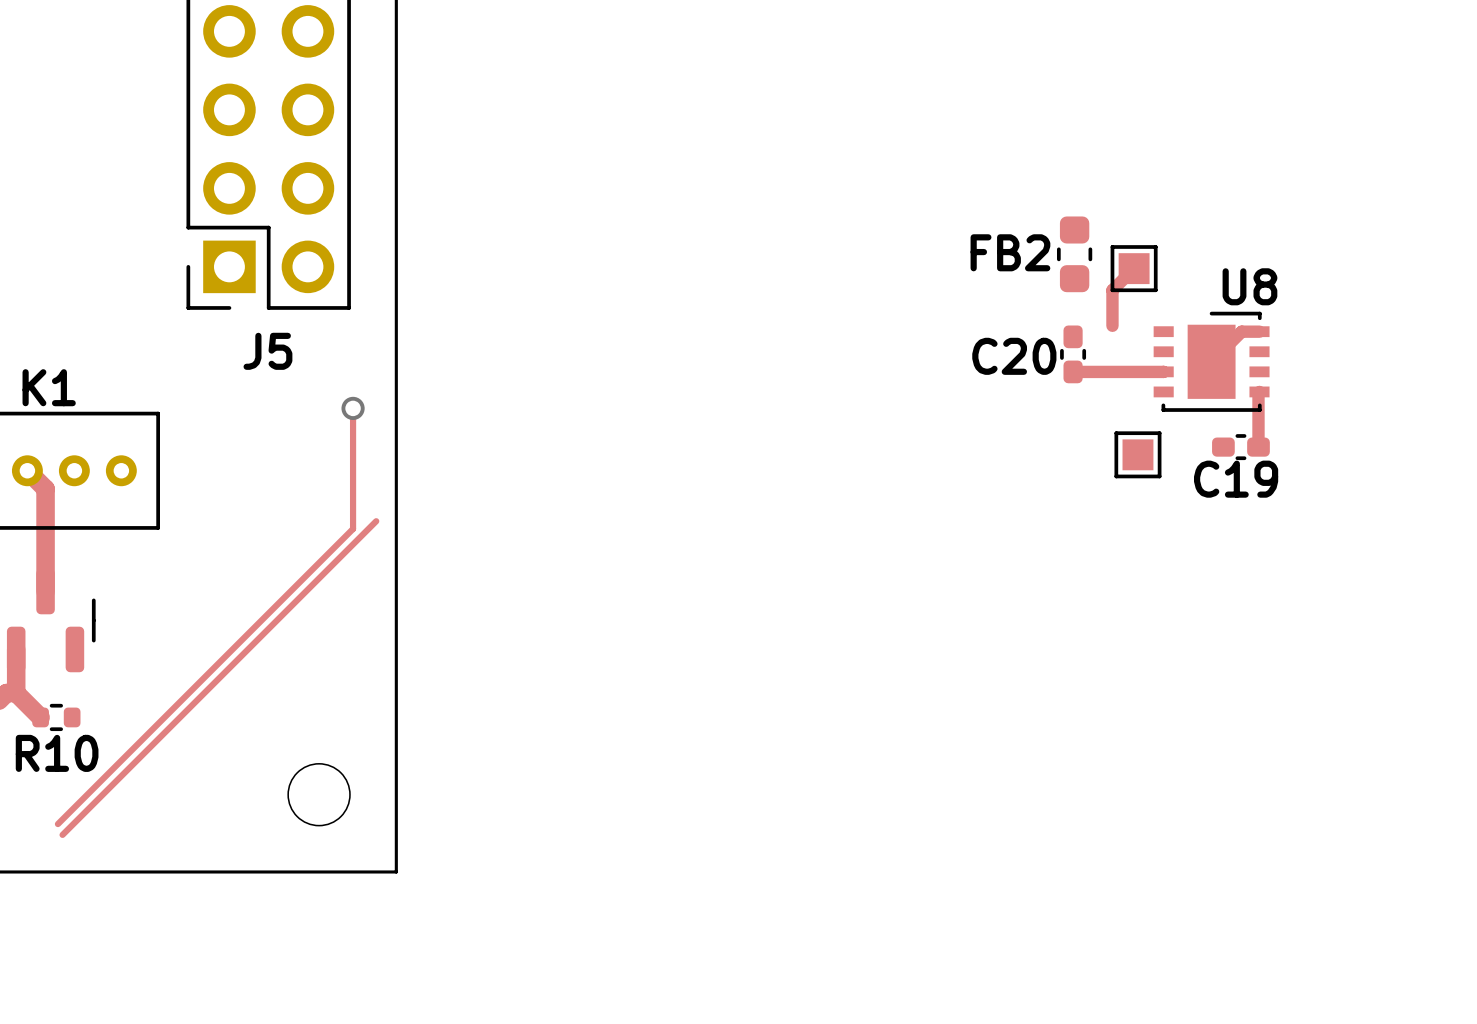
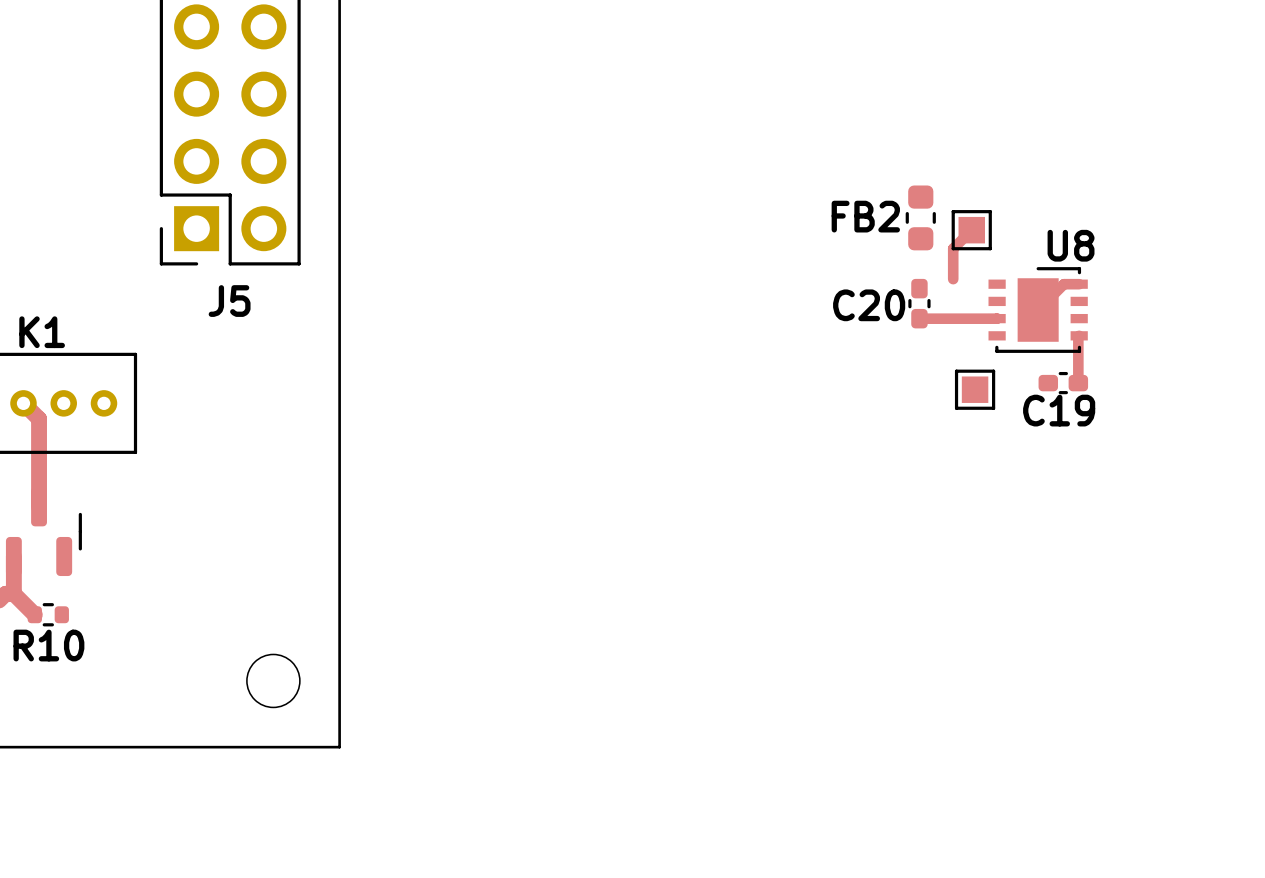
track: (353, 408) (353, 528) (57, 824) -> none
via: (353, 408) -> none
track: (376, 521) (62, 834) -> none

